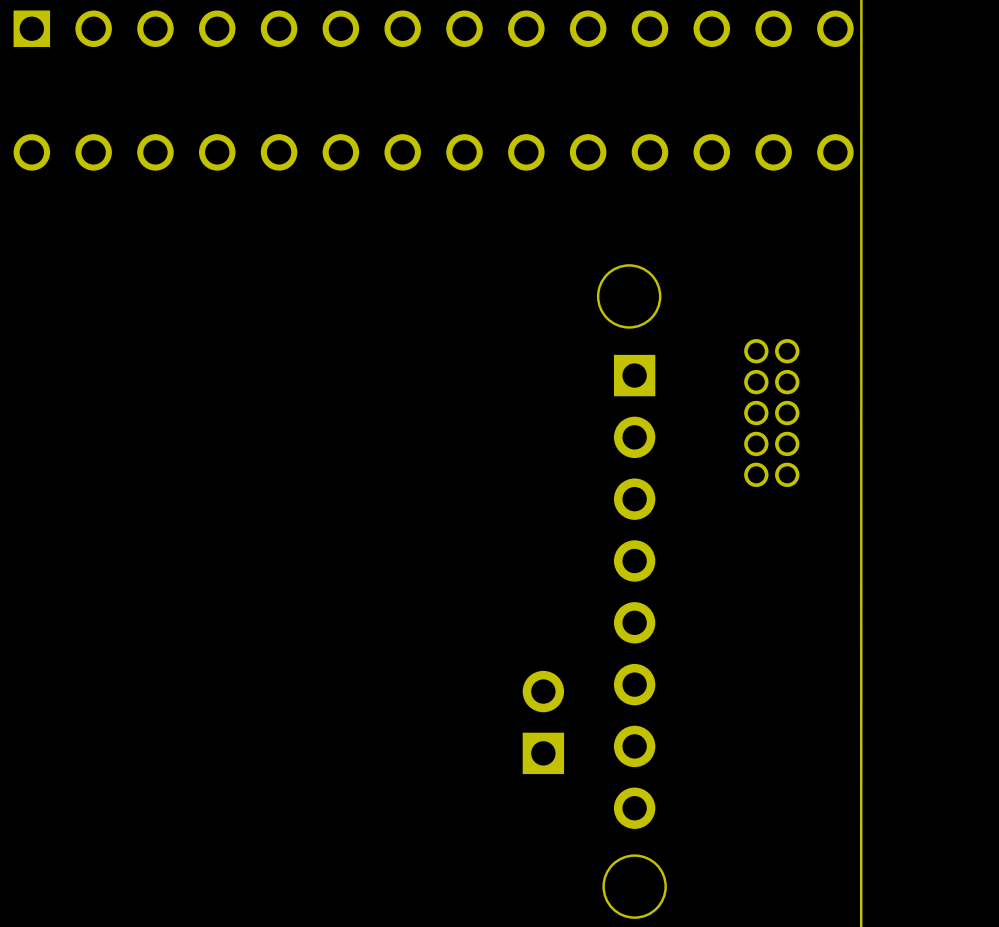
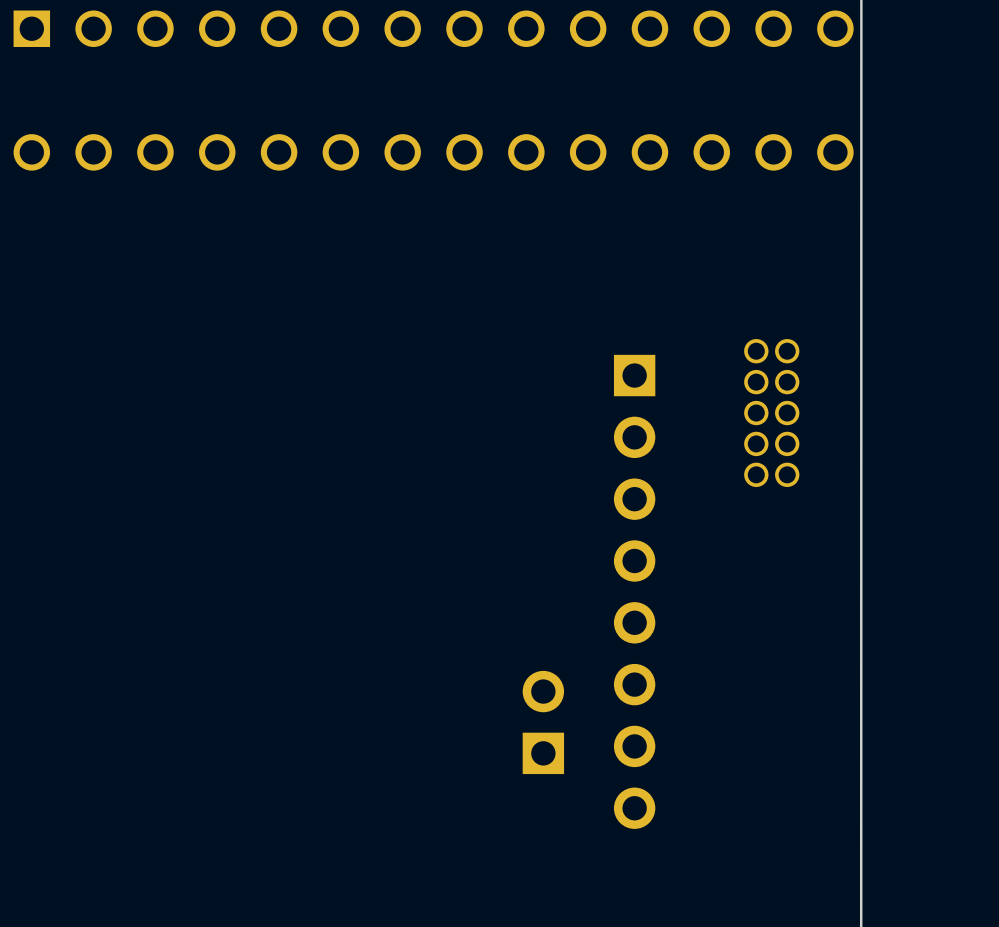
round board edge: [596, 264, 662, 329] -> none
round board edge: [602, 854, 667, 919] -> none

